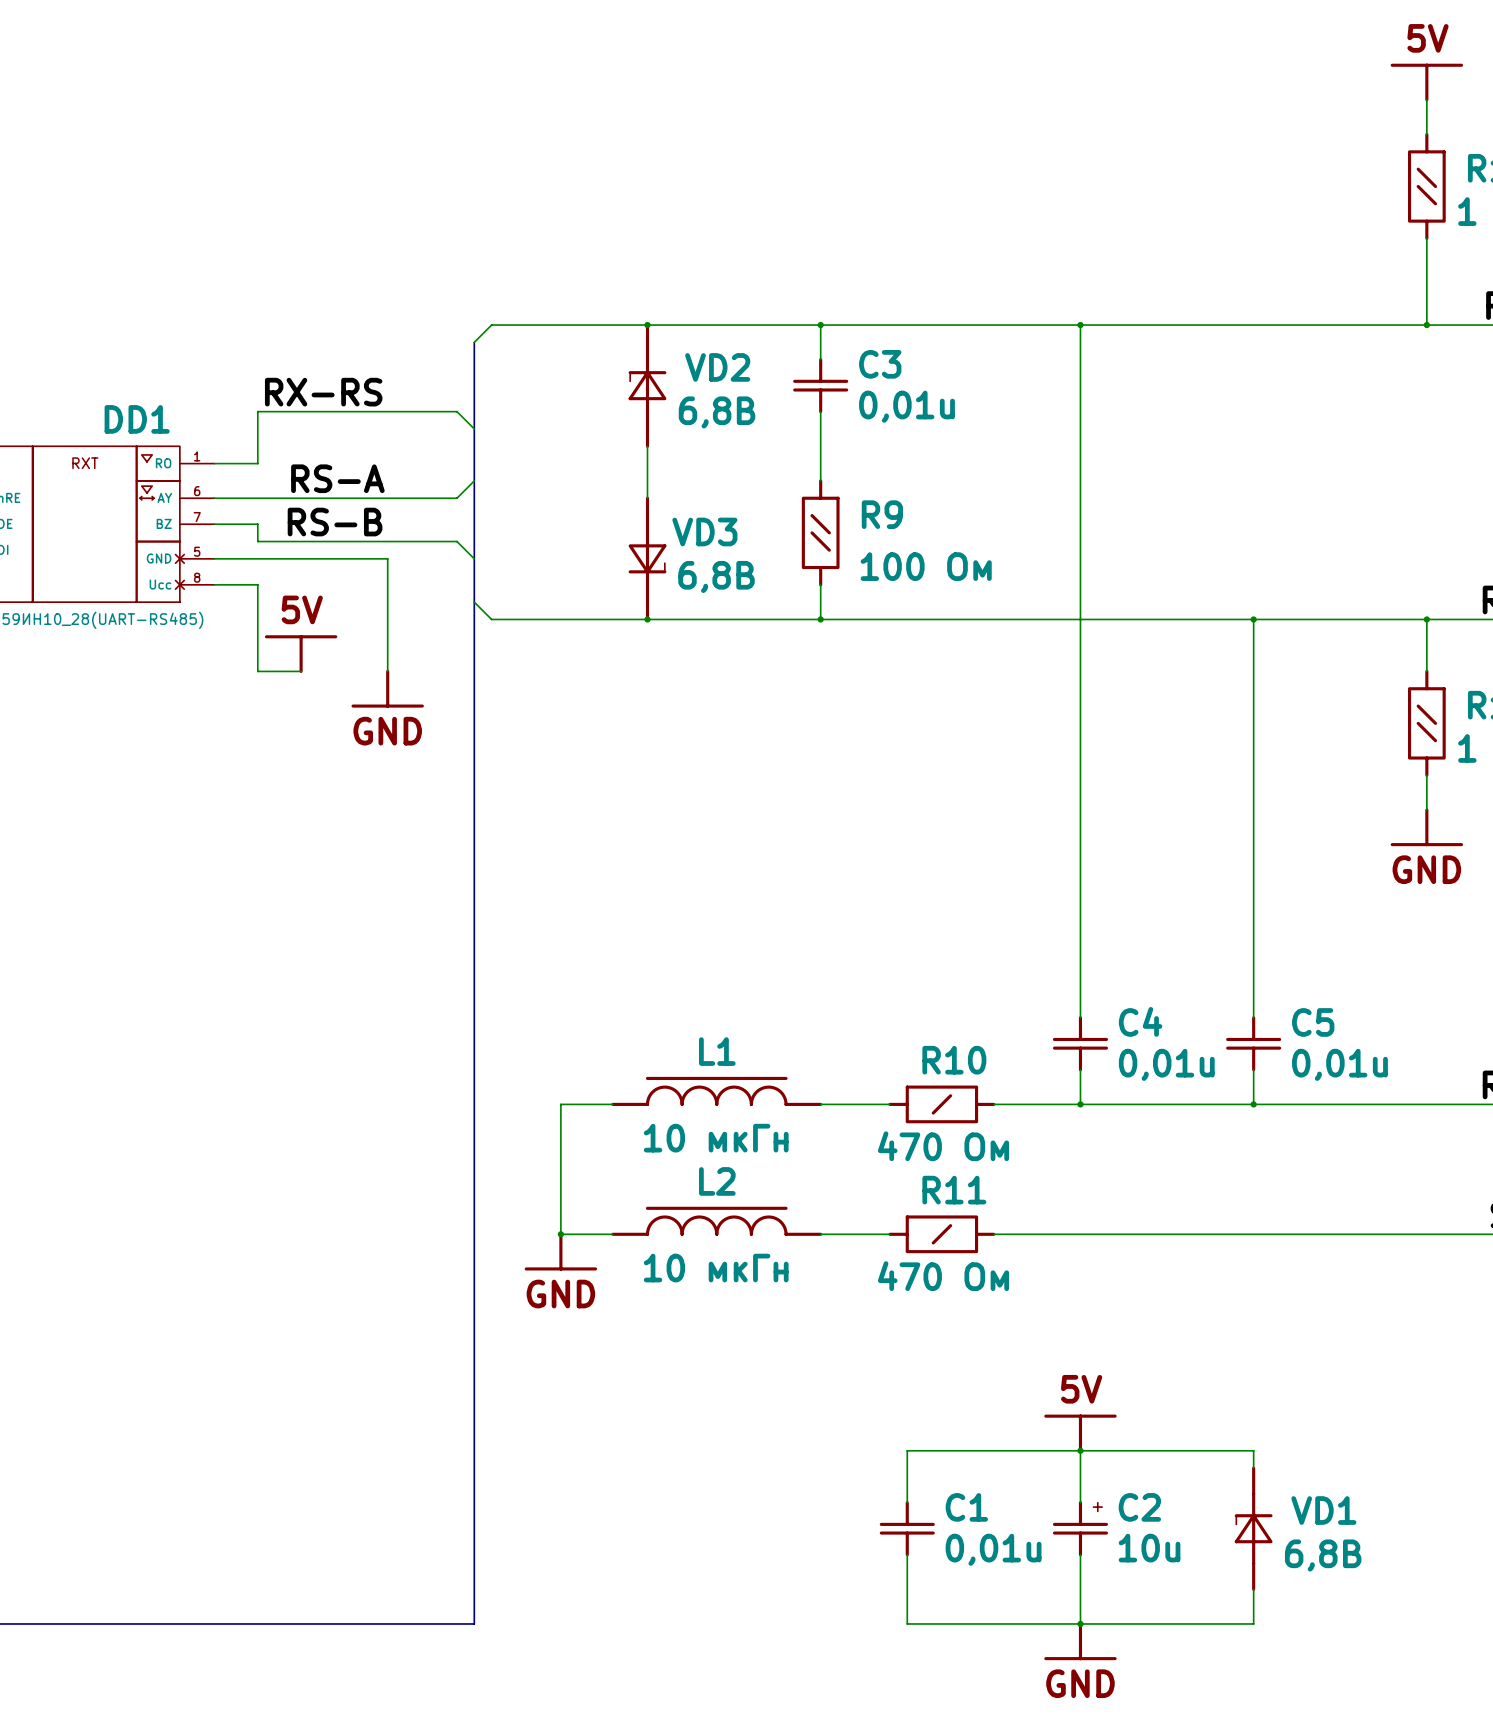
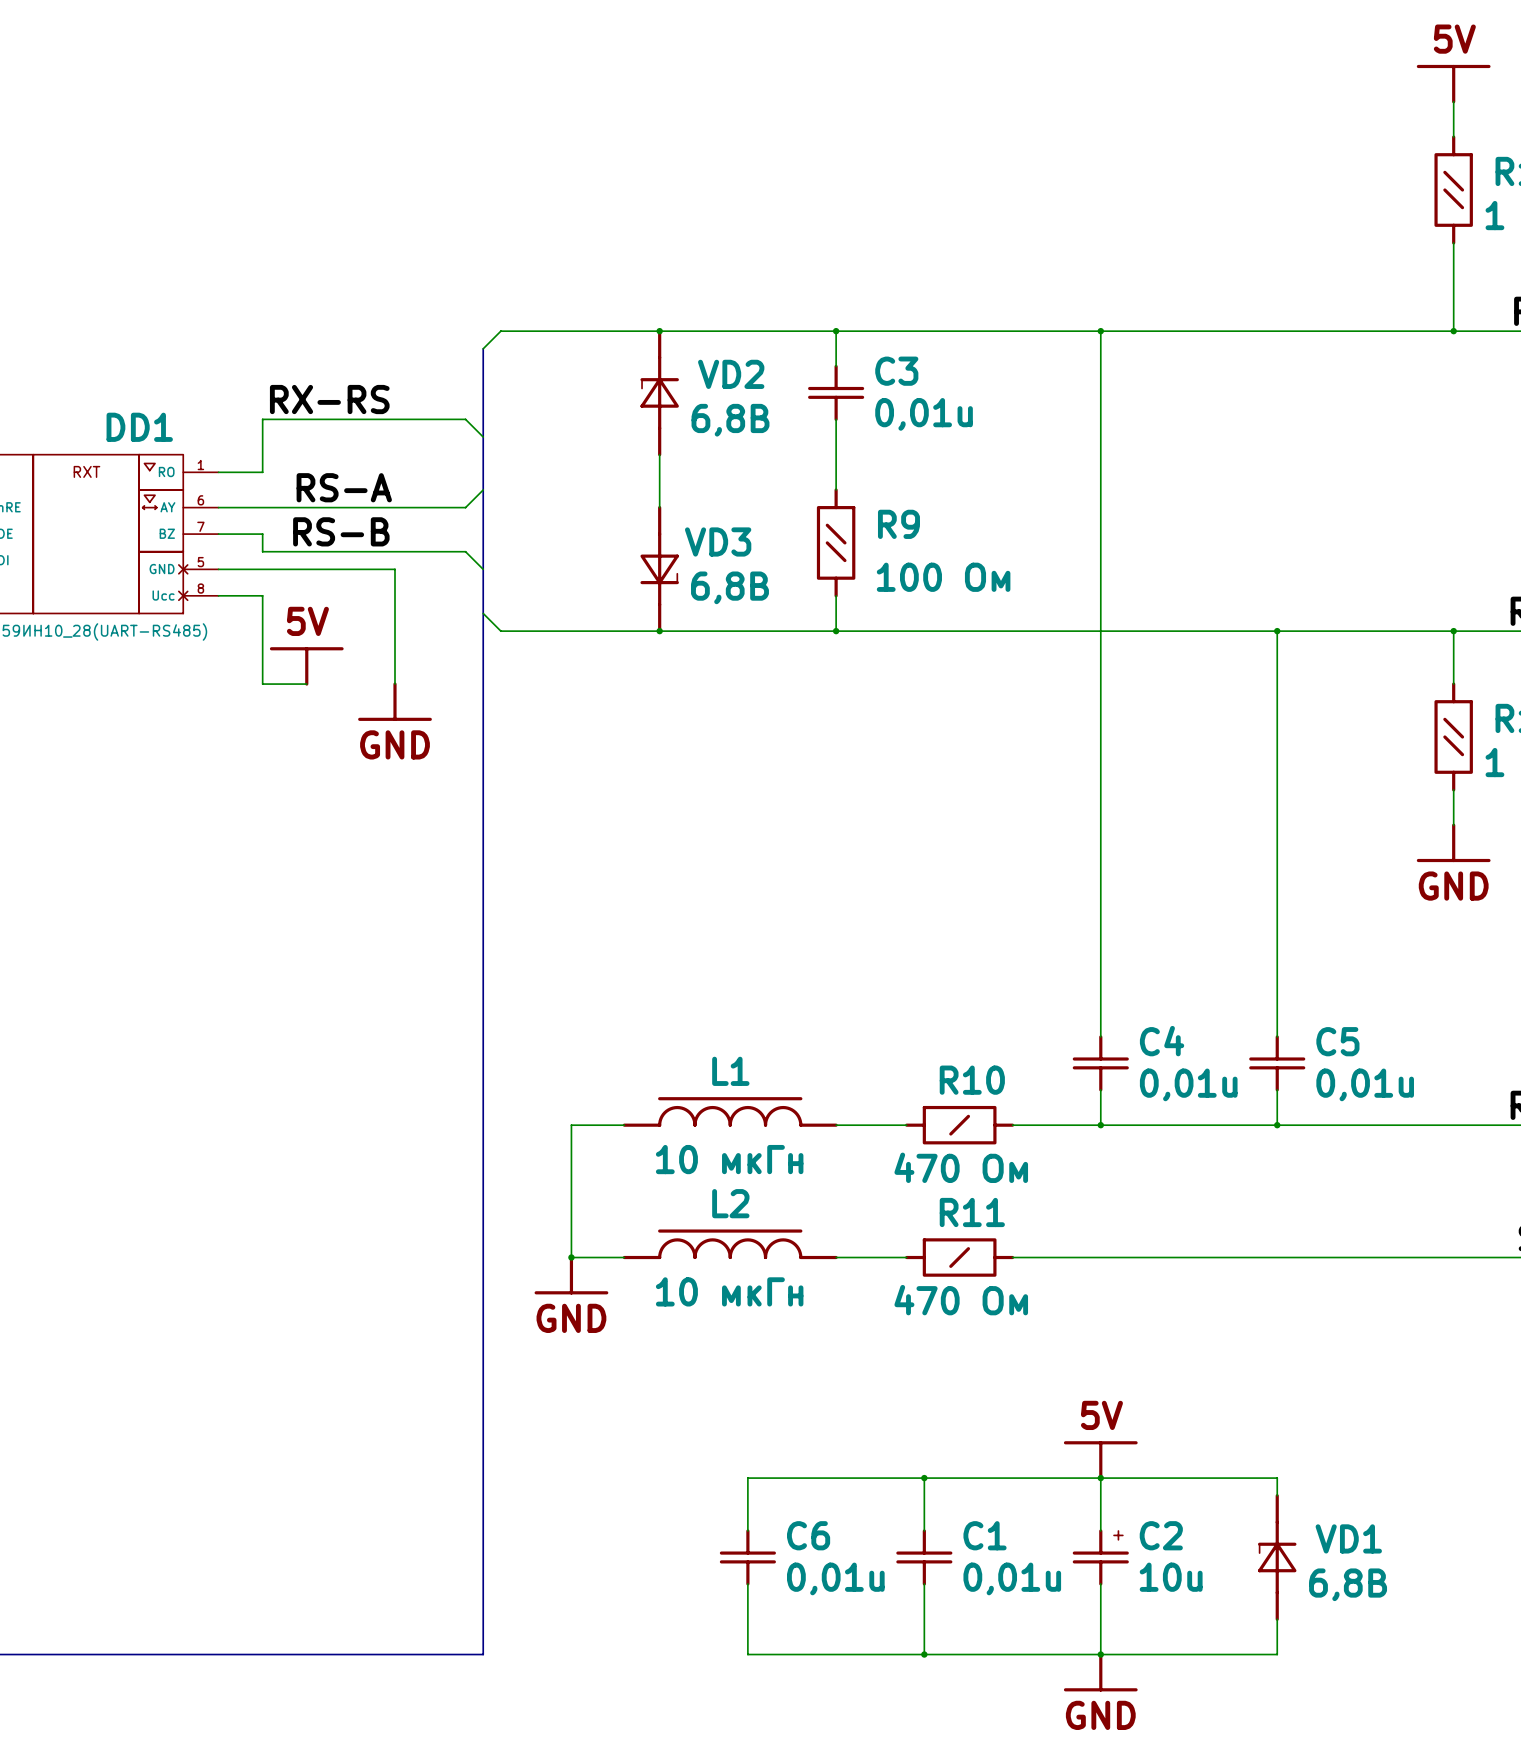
wire: none -> (924, 1478) (747, 1478) (747, 1531)
junction: none -> (924, 1478)
C6: none -> (747, 1557)
wire: none -> (747, 1583) (747, 1654) (924, 1654)
junction: none -> (924, 1654)

